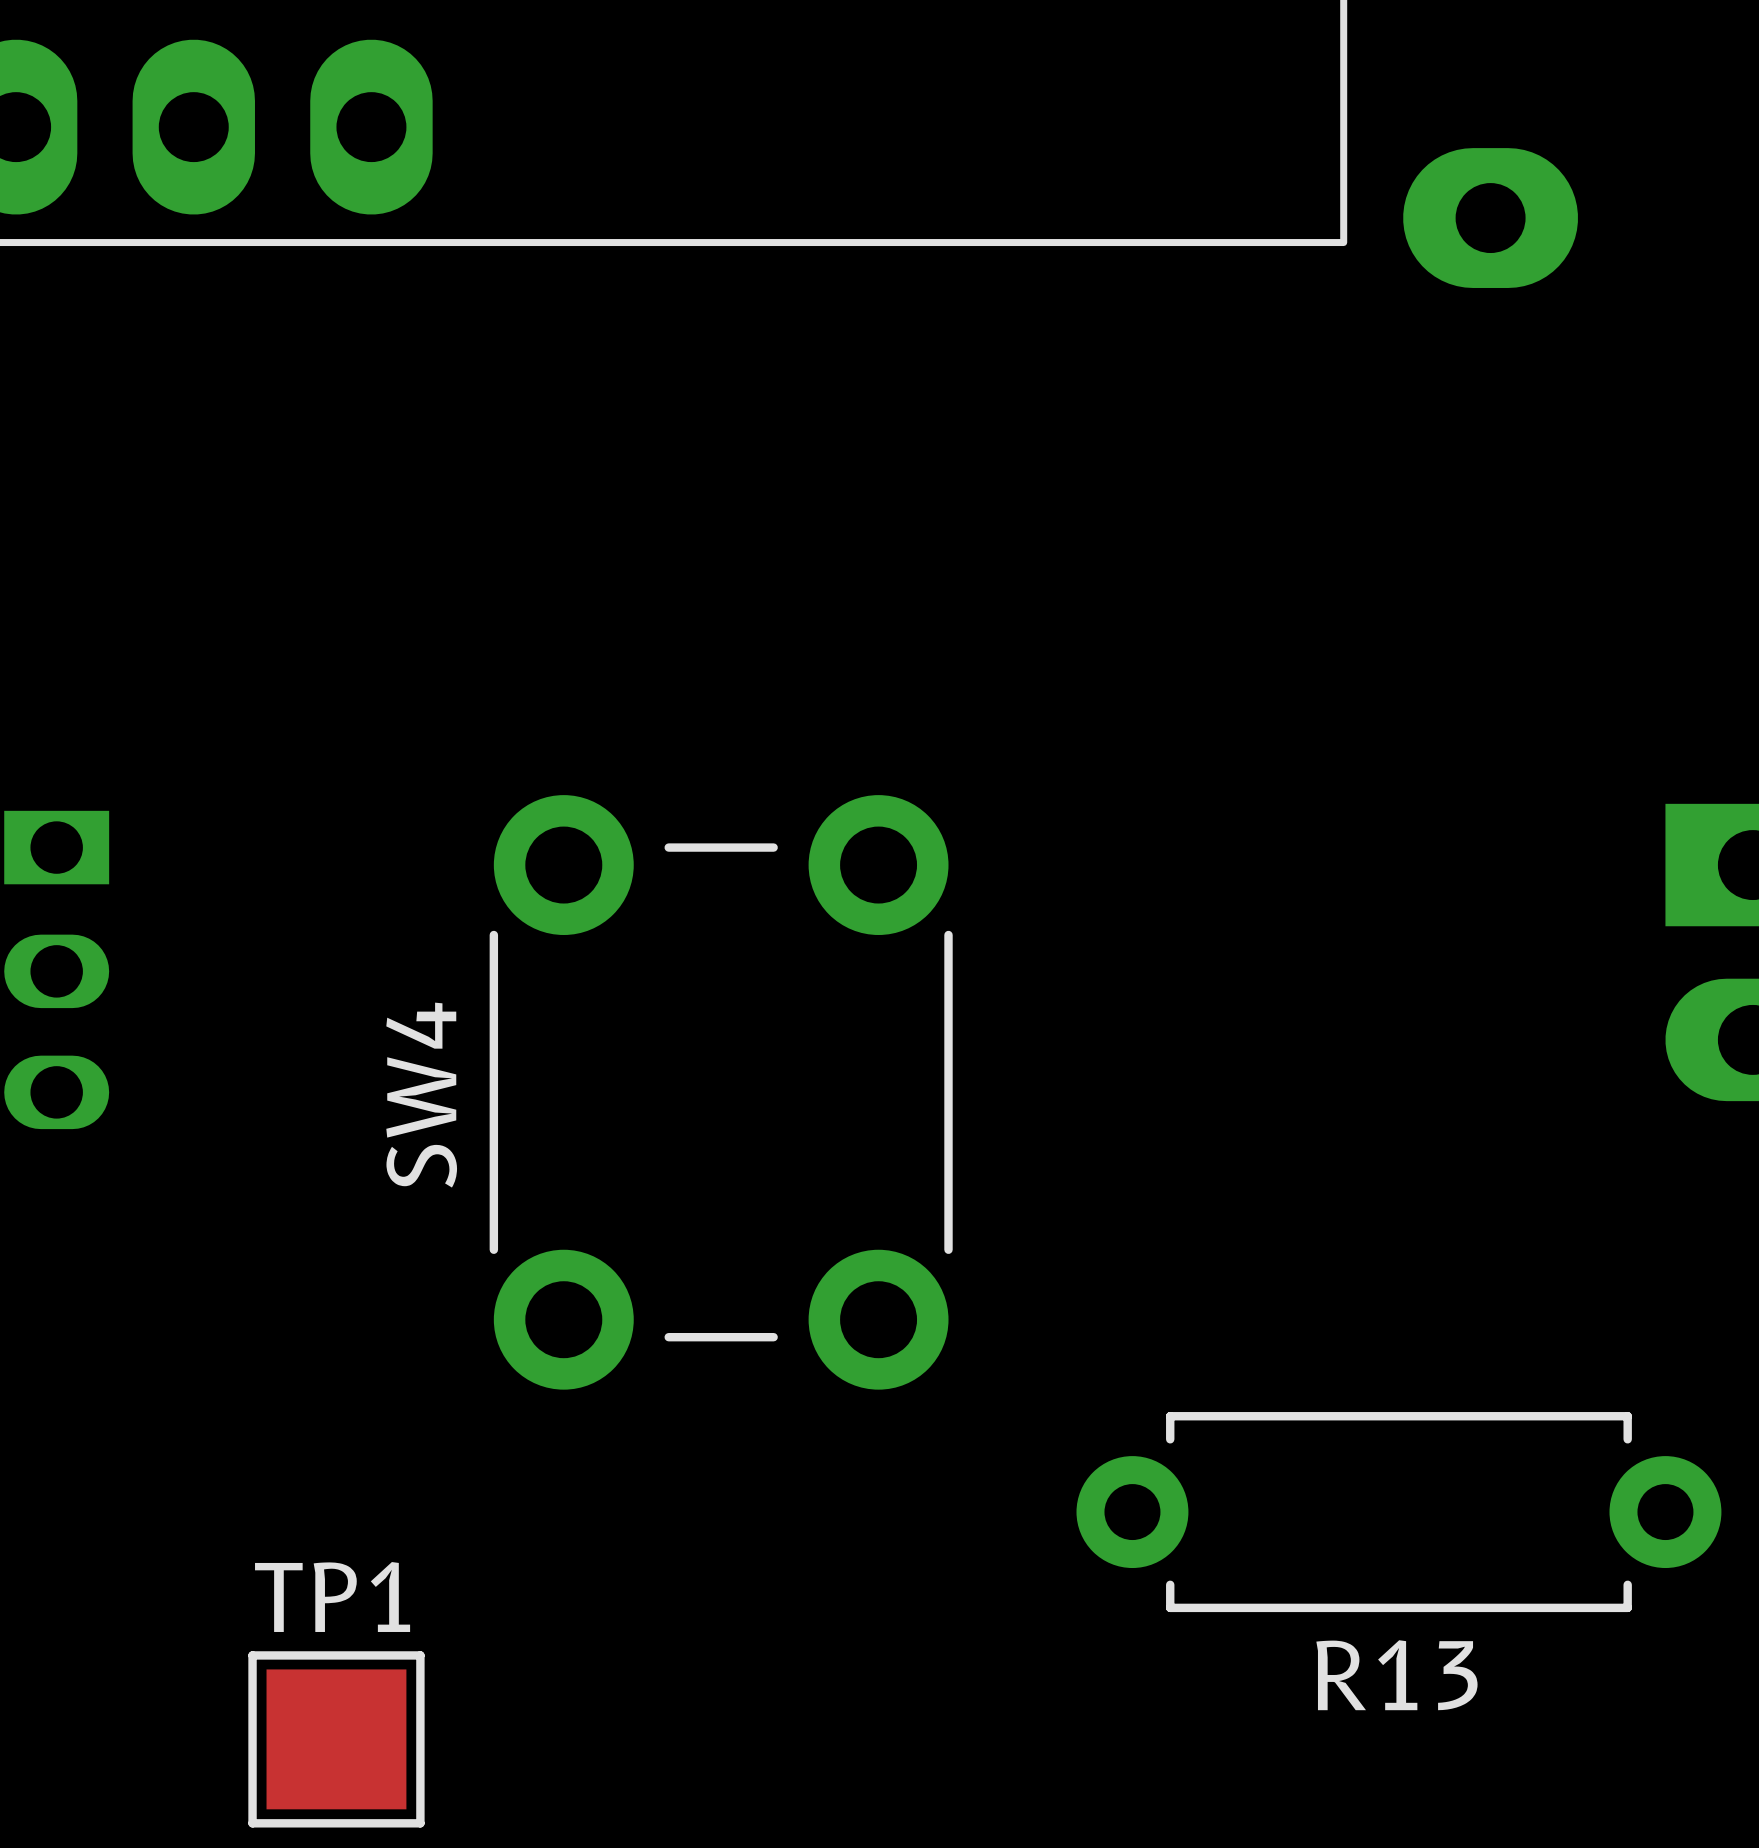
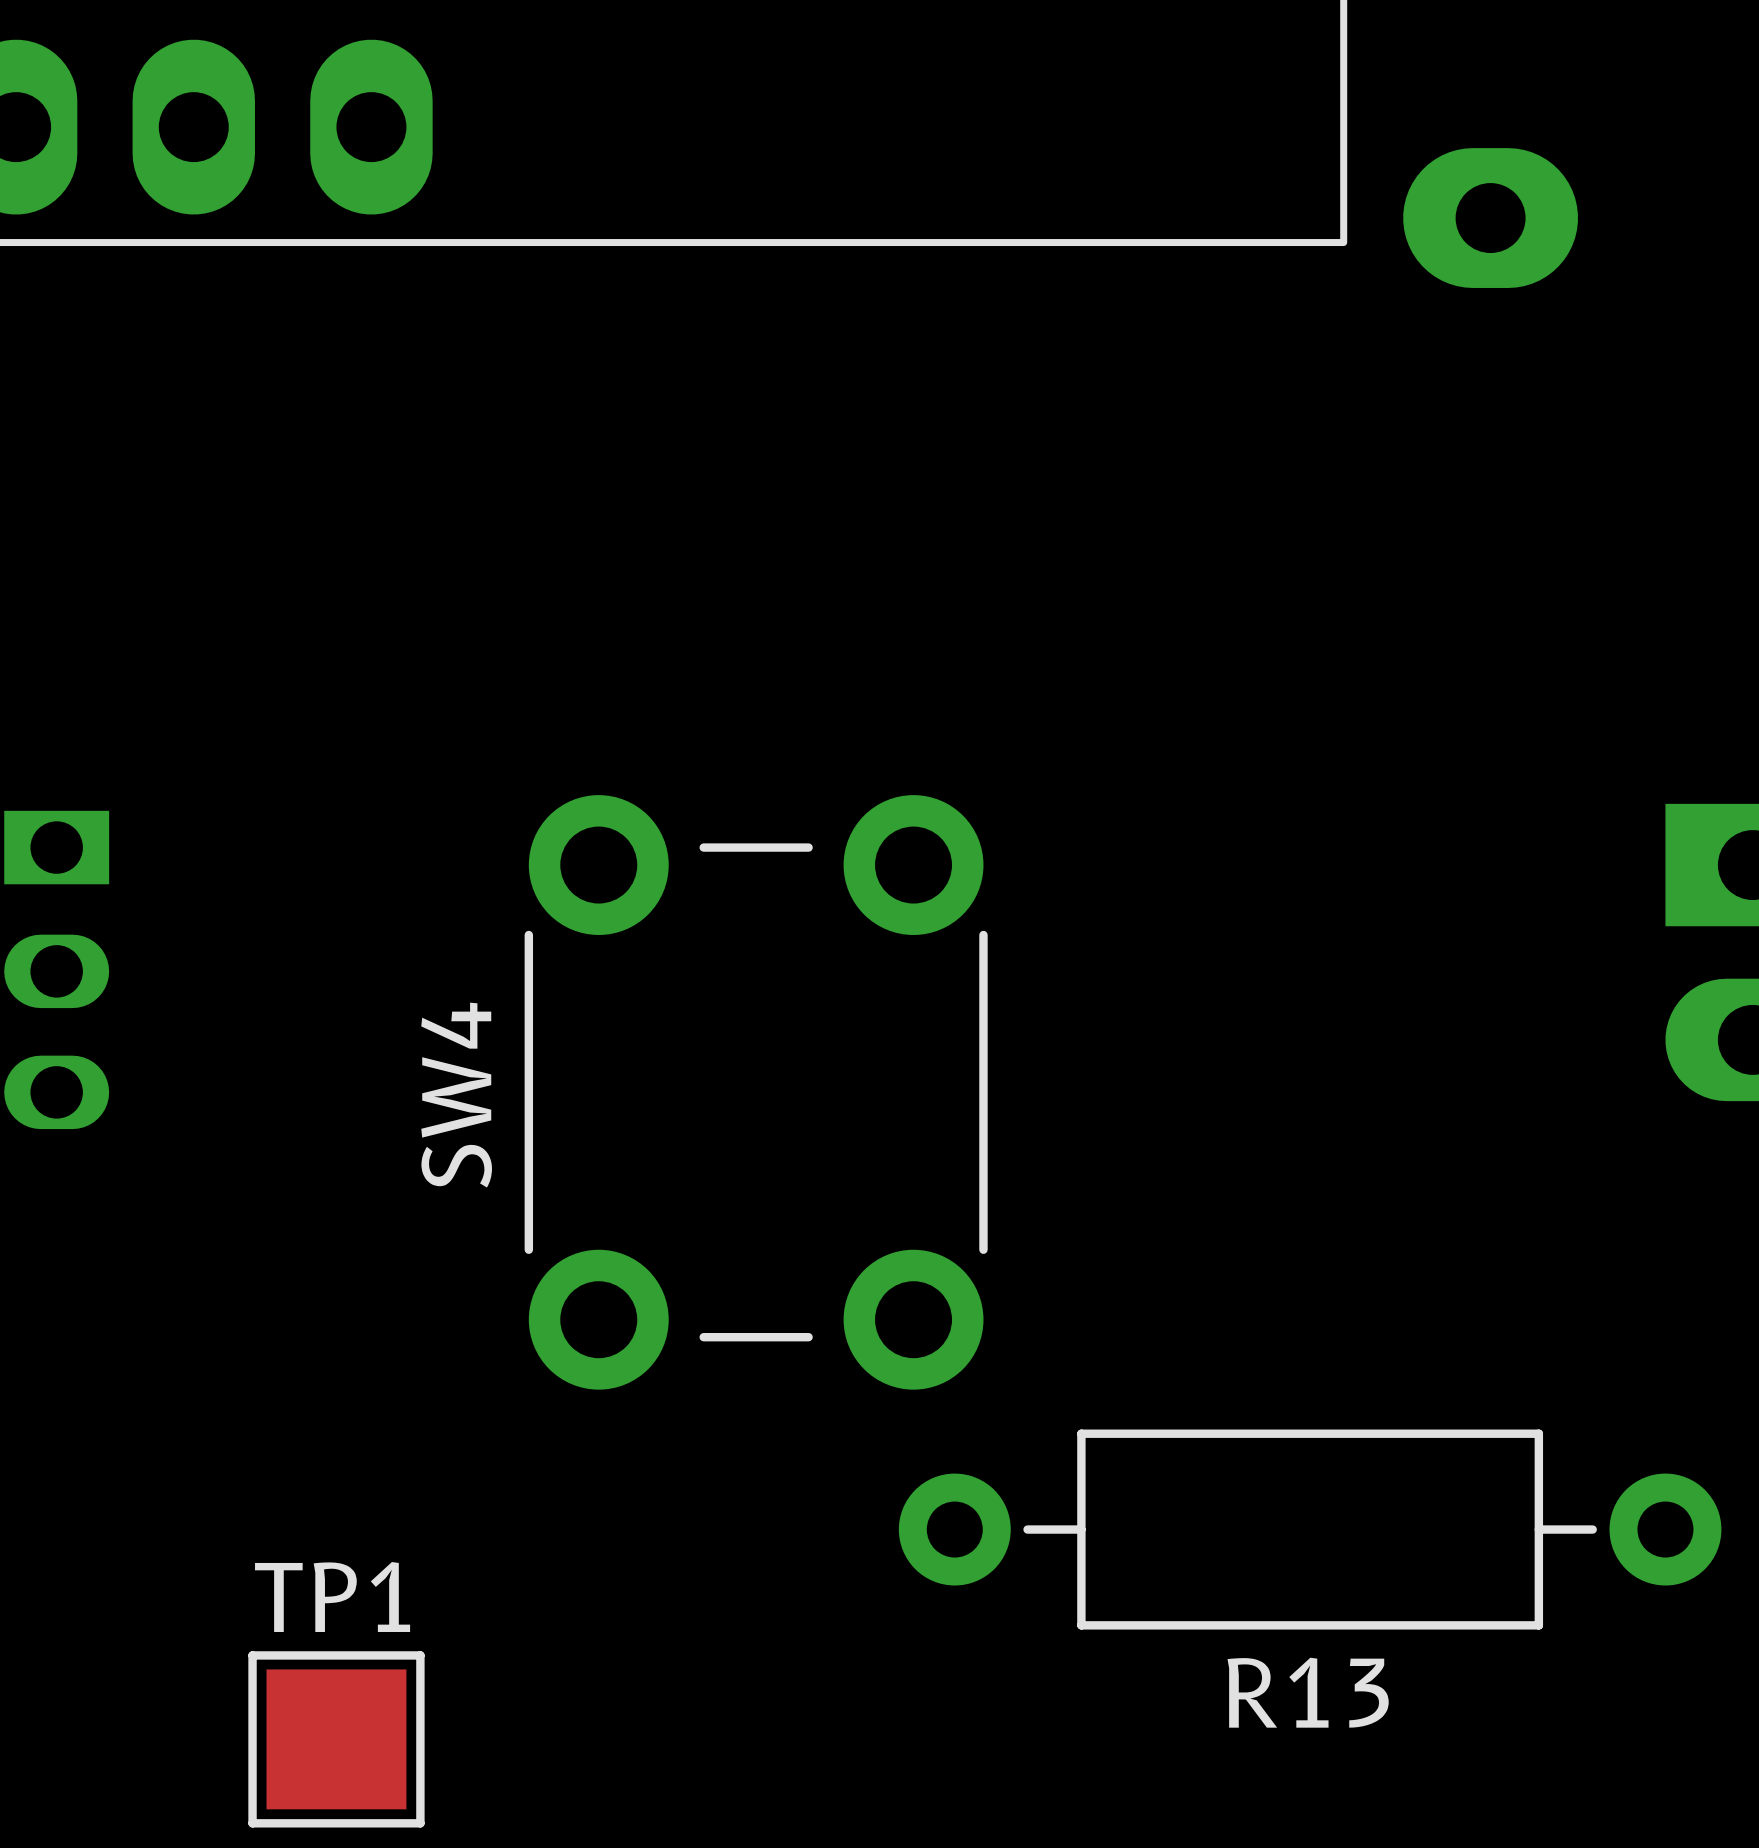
SW4 position: (721, 1092) -> (756, 1092)
R13 footprint: [1076, 1412, 1722, 1613] -> [898, 1429, 1722, 1630]

